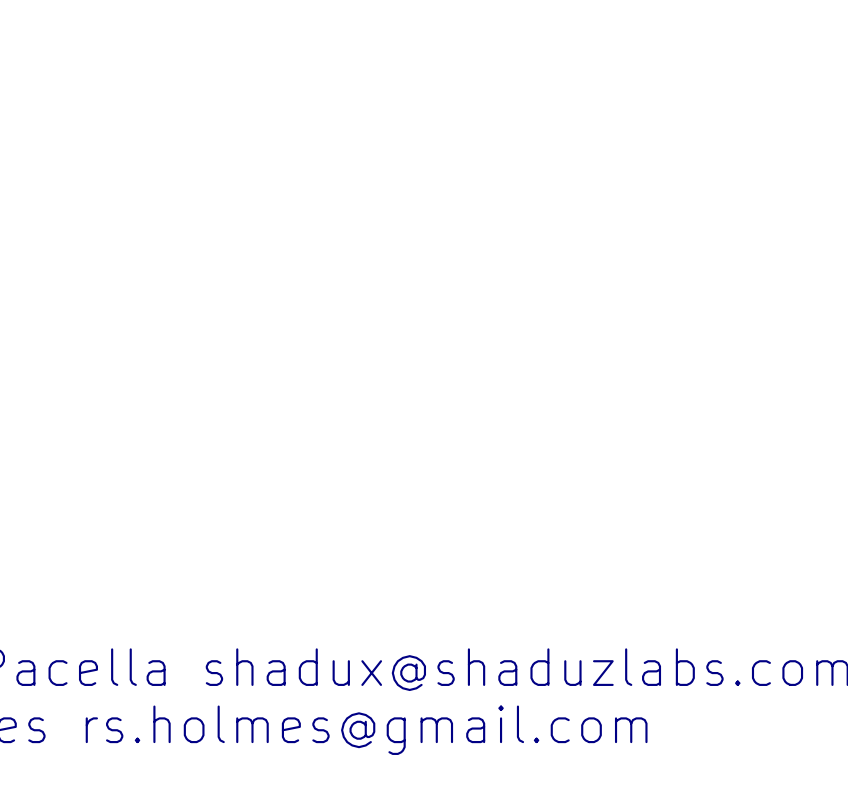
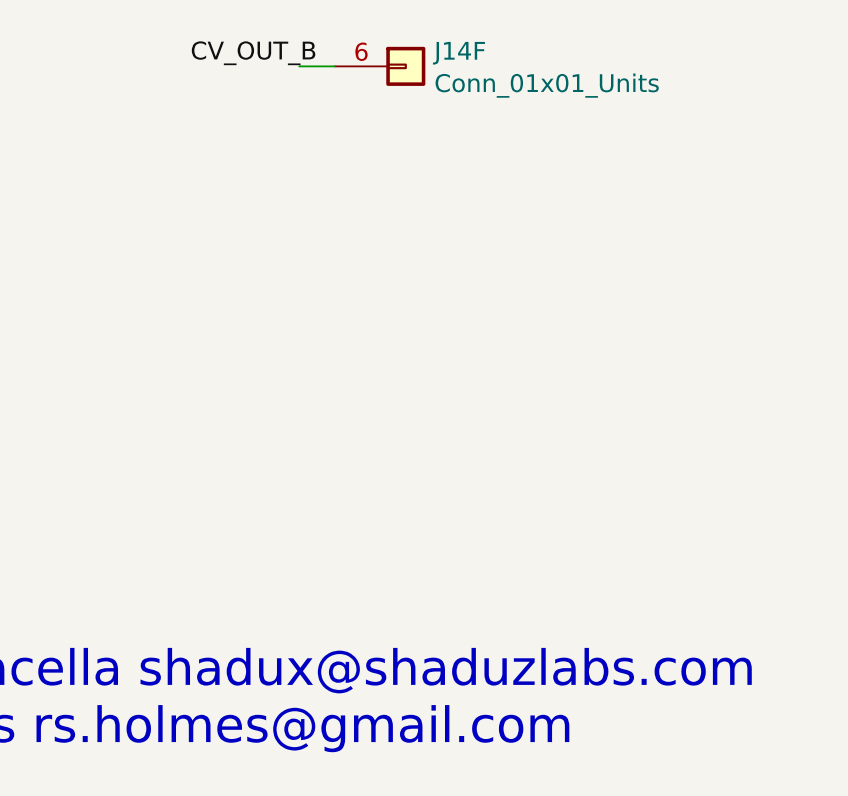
label: none -> CV_OUT_B (253, 53)
wire: none -> (299, 66) (334, 66)
J14F: none -> Conn_01x01_Units (380, 66)

